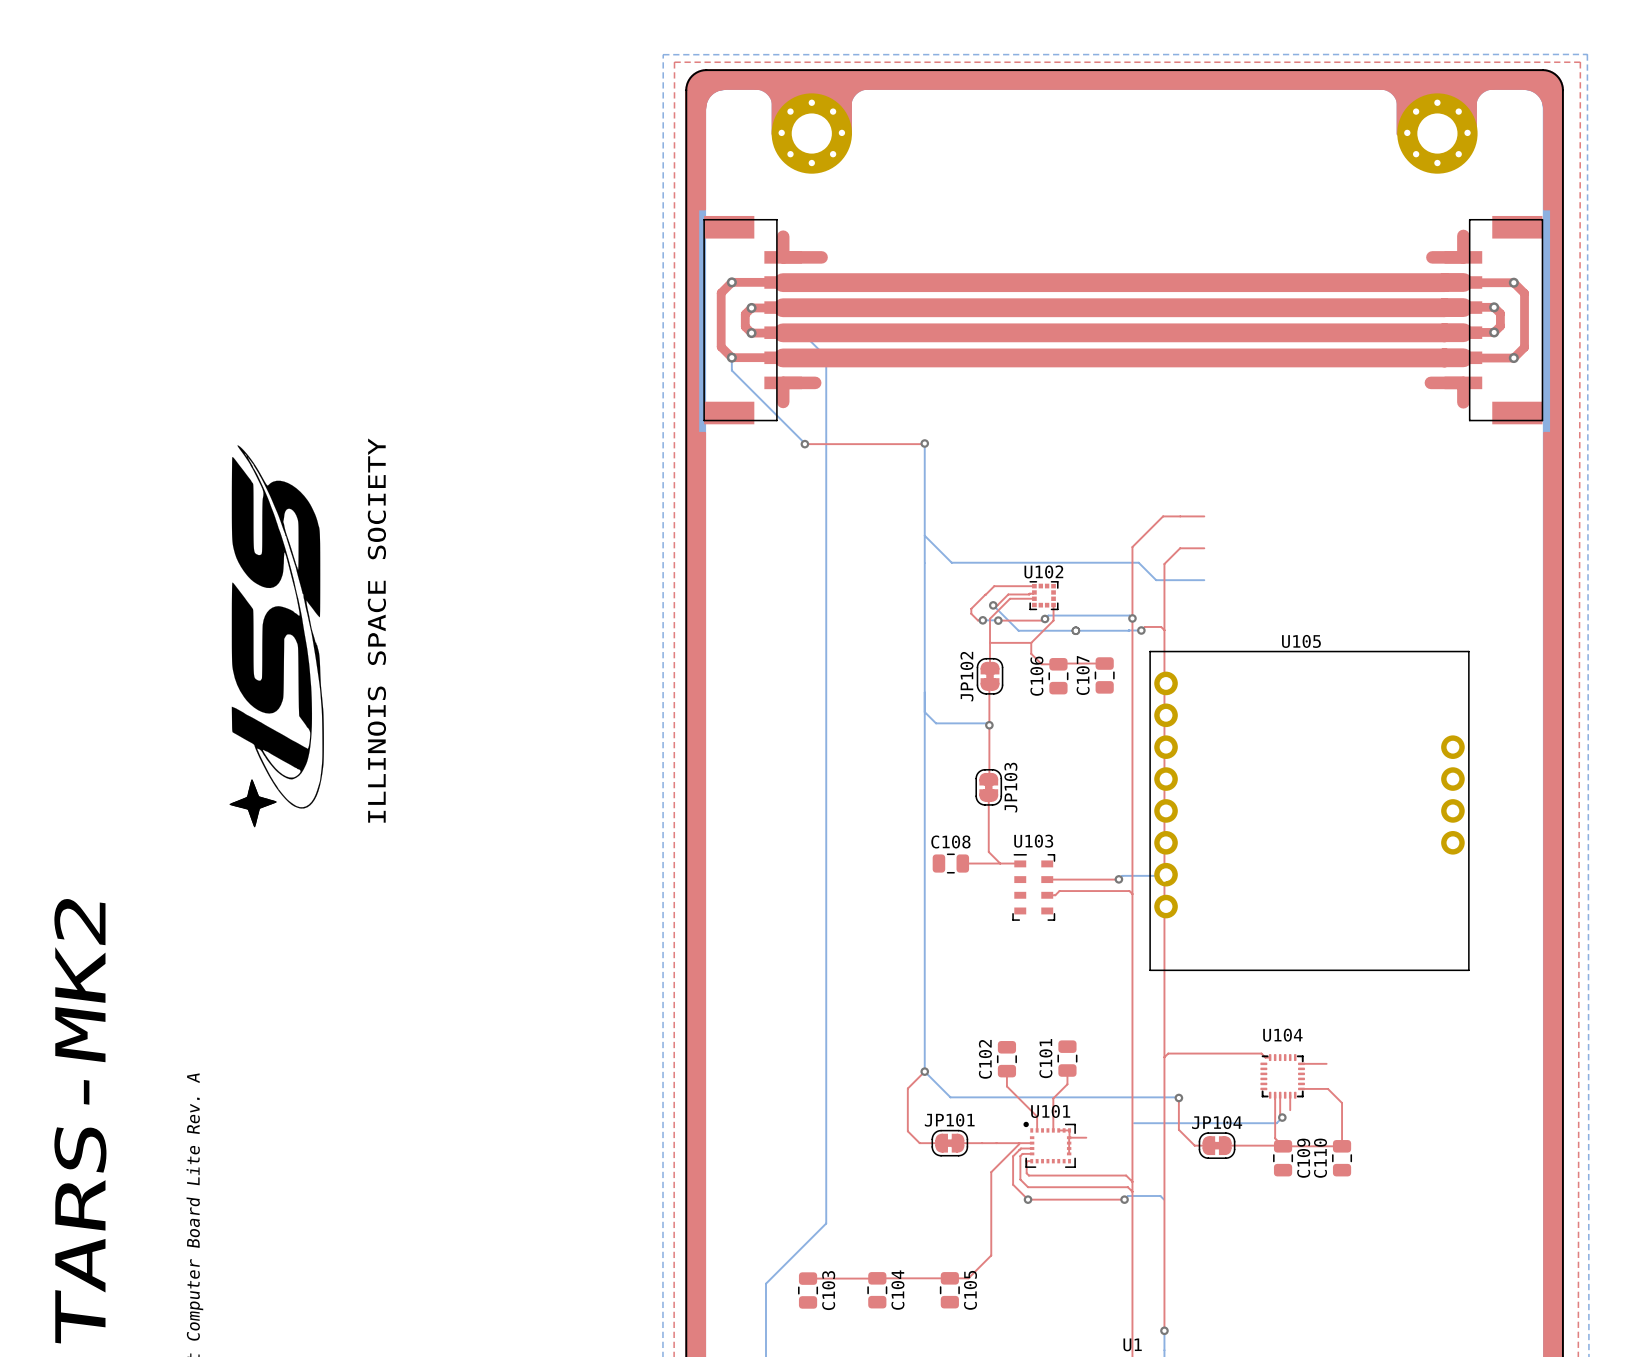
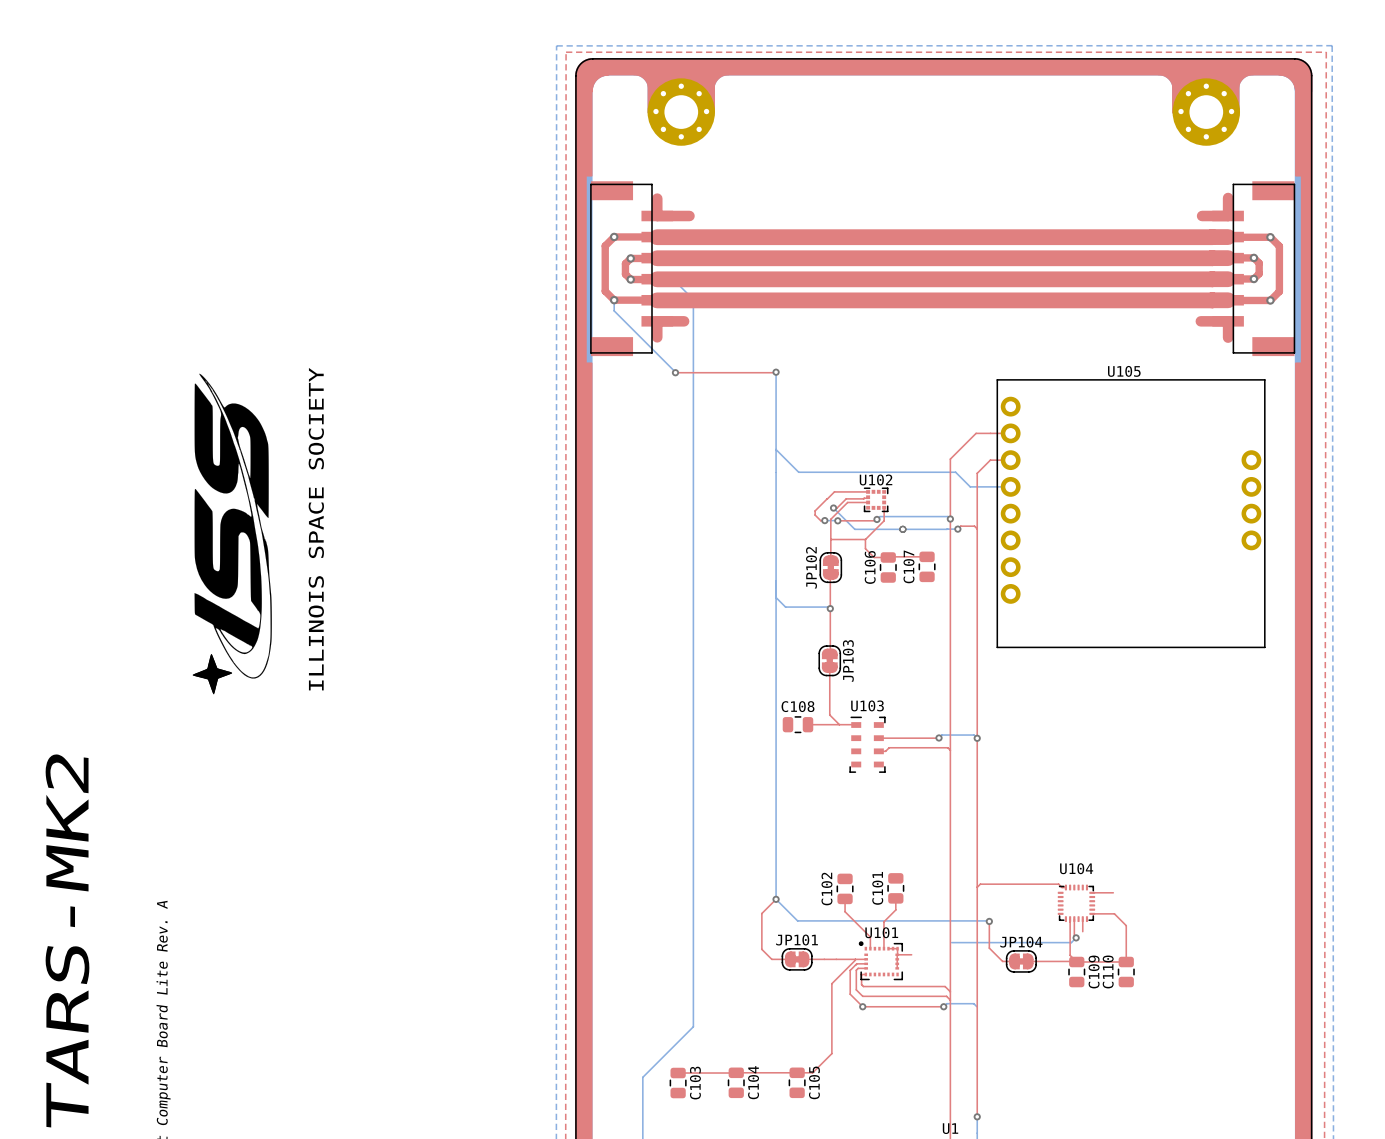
U105 position: (1309, 810) -> (1131, 513)

